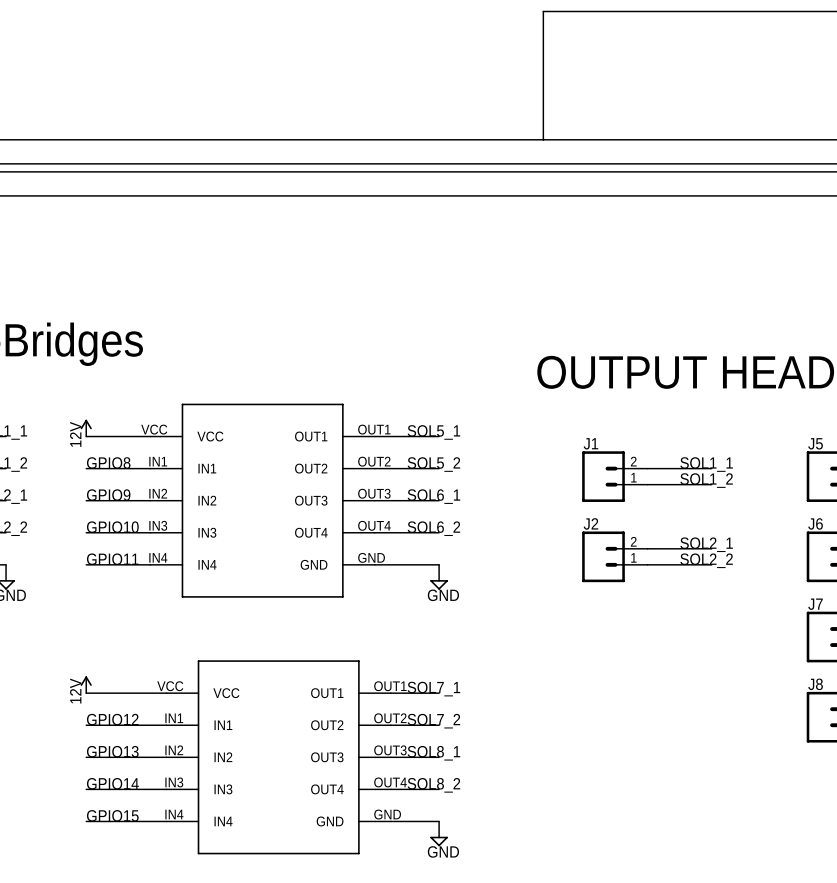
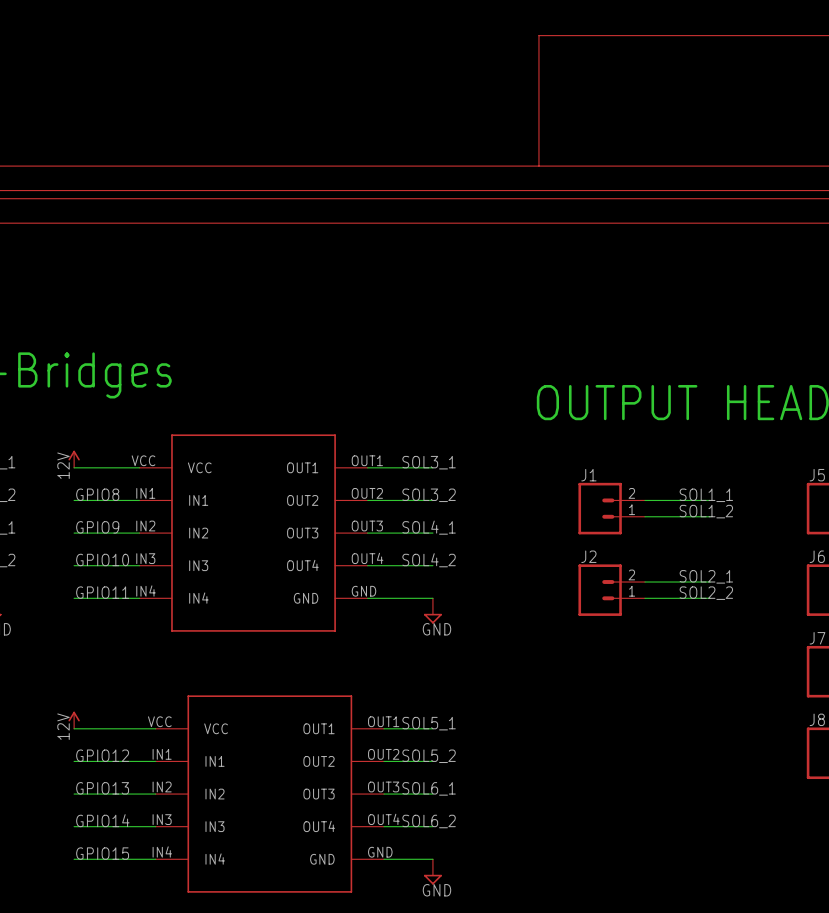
label: SOL5_1 (433, 432) -> SOL3_1 (429, 462)
label: SOL5_2 (433, 464) -> SOL3_2 (429, 495)
label: SOL6_1 (433, 496) -> SOL4_1 (429, 527)
label: SOL6_2 (433, 528) -> SOL4_2 (429, 560)
label: SOL7_1 (433, 689) -> SOL5_1 (429, 723)
label: SOL7_2 (433, 721) -> SOL5_2 (429, 756)
label: SOL8_1 (433, 753) -> SOL6_1 (429, 788)
label: SOL8_2 (433, 785) -> SOL6_2 (429, 821)

